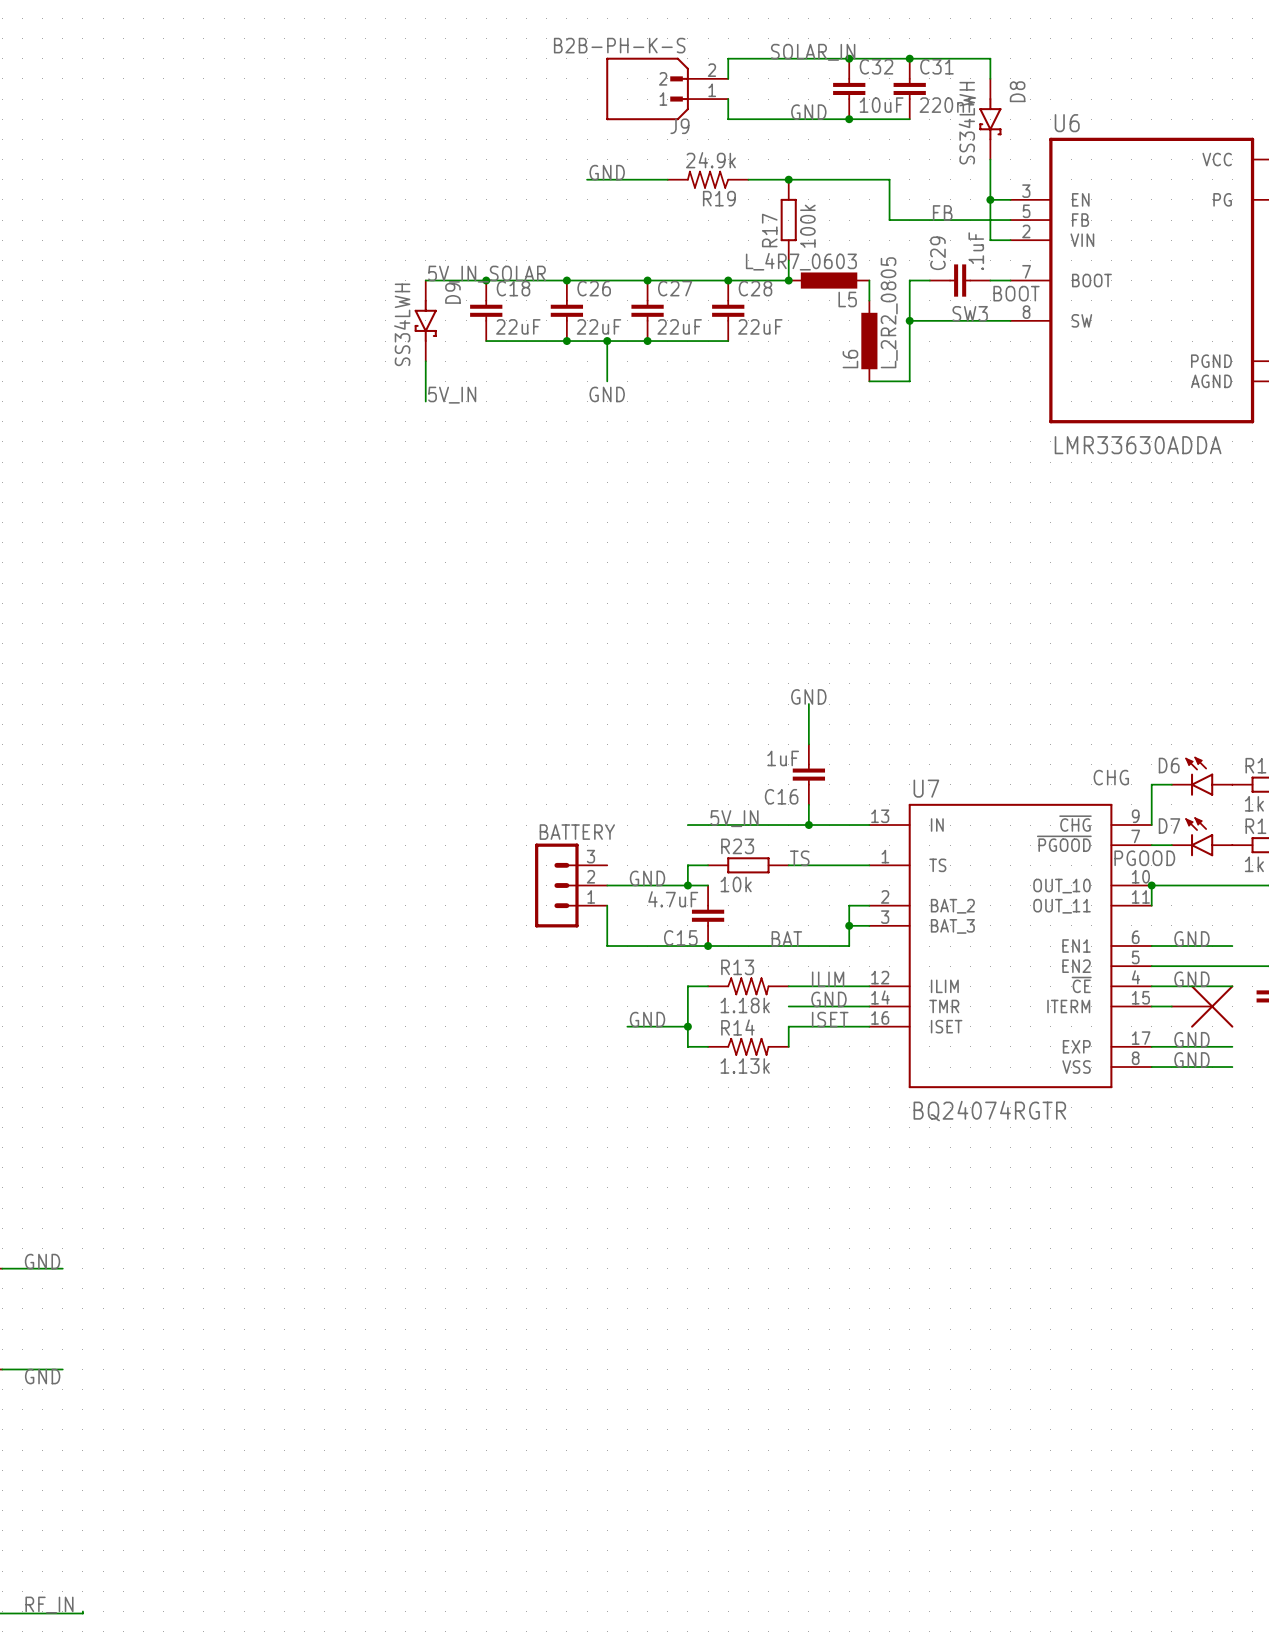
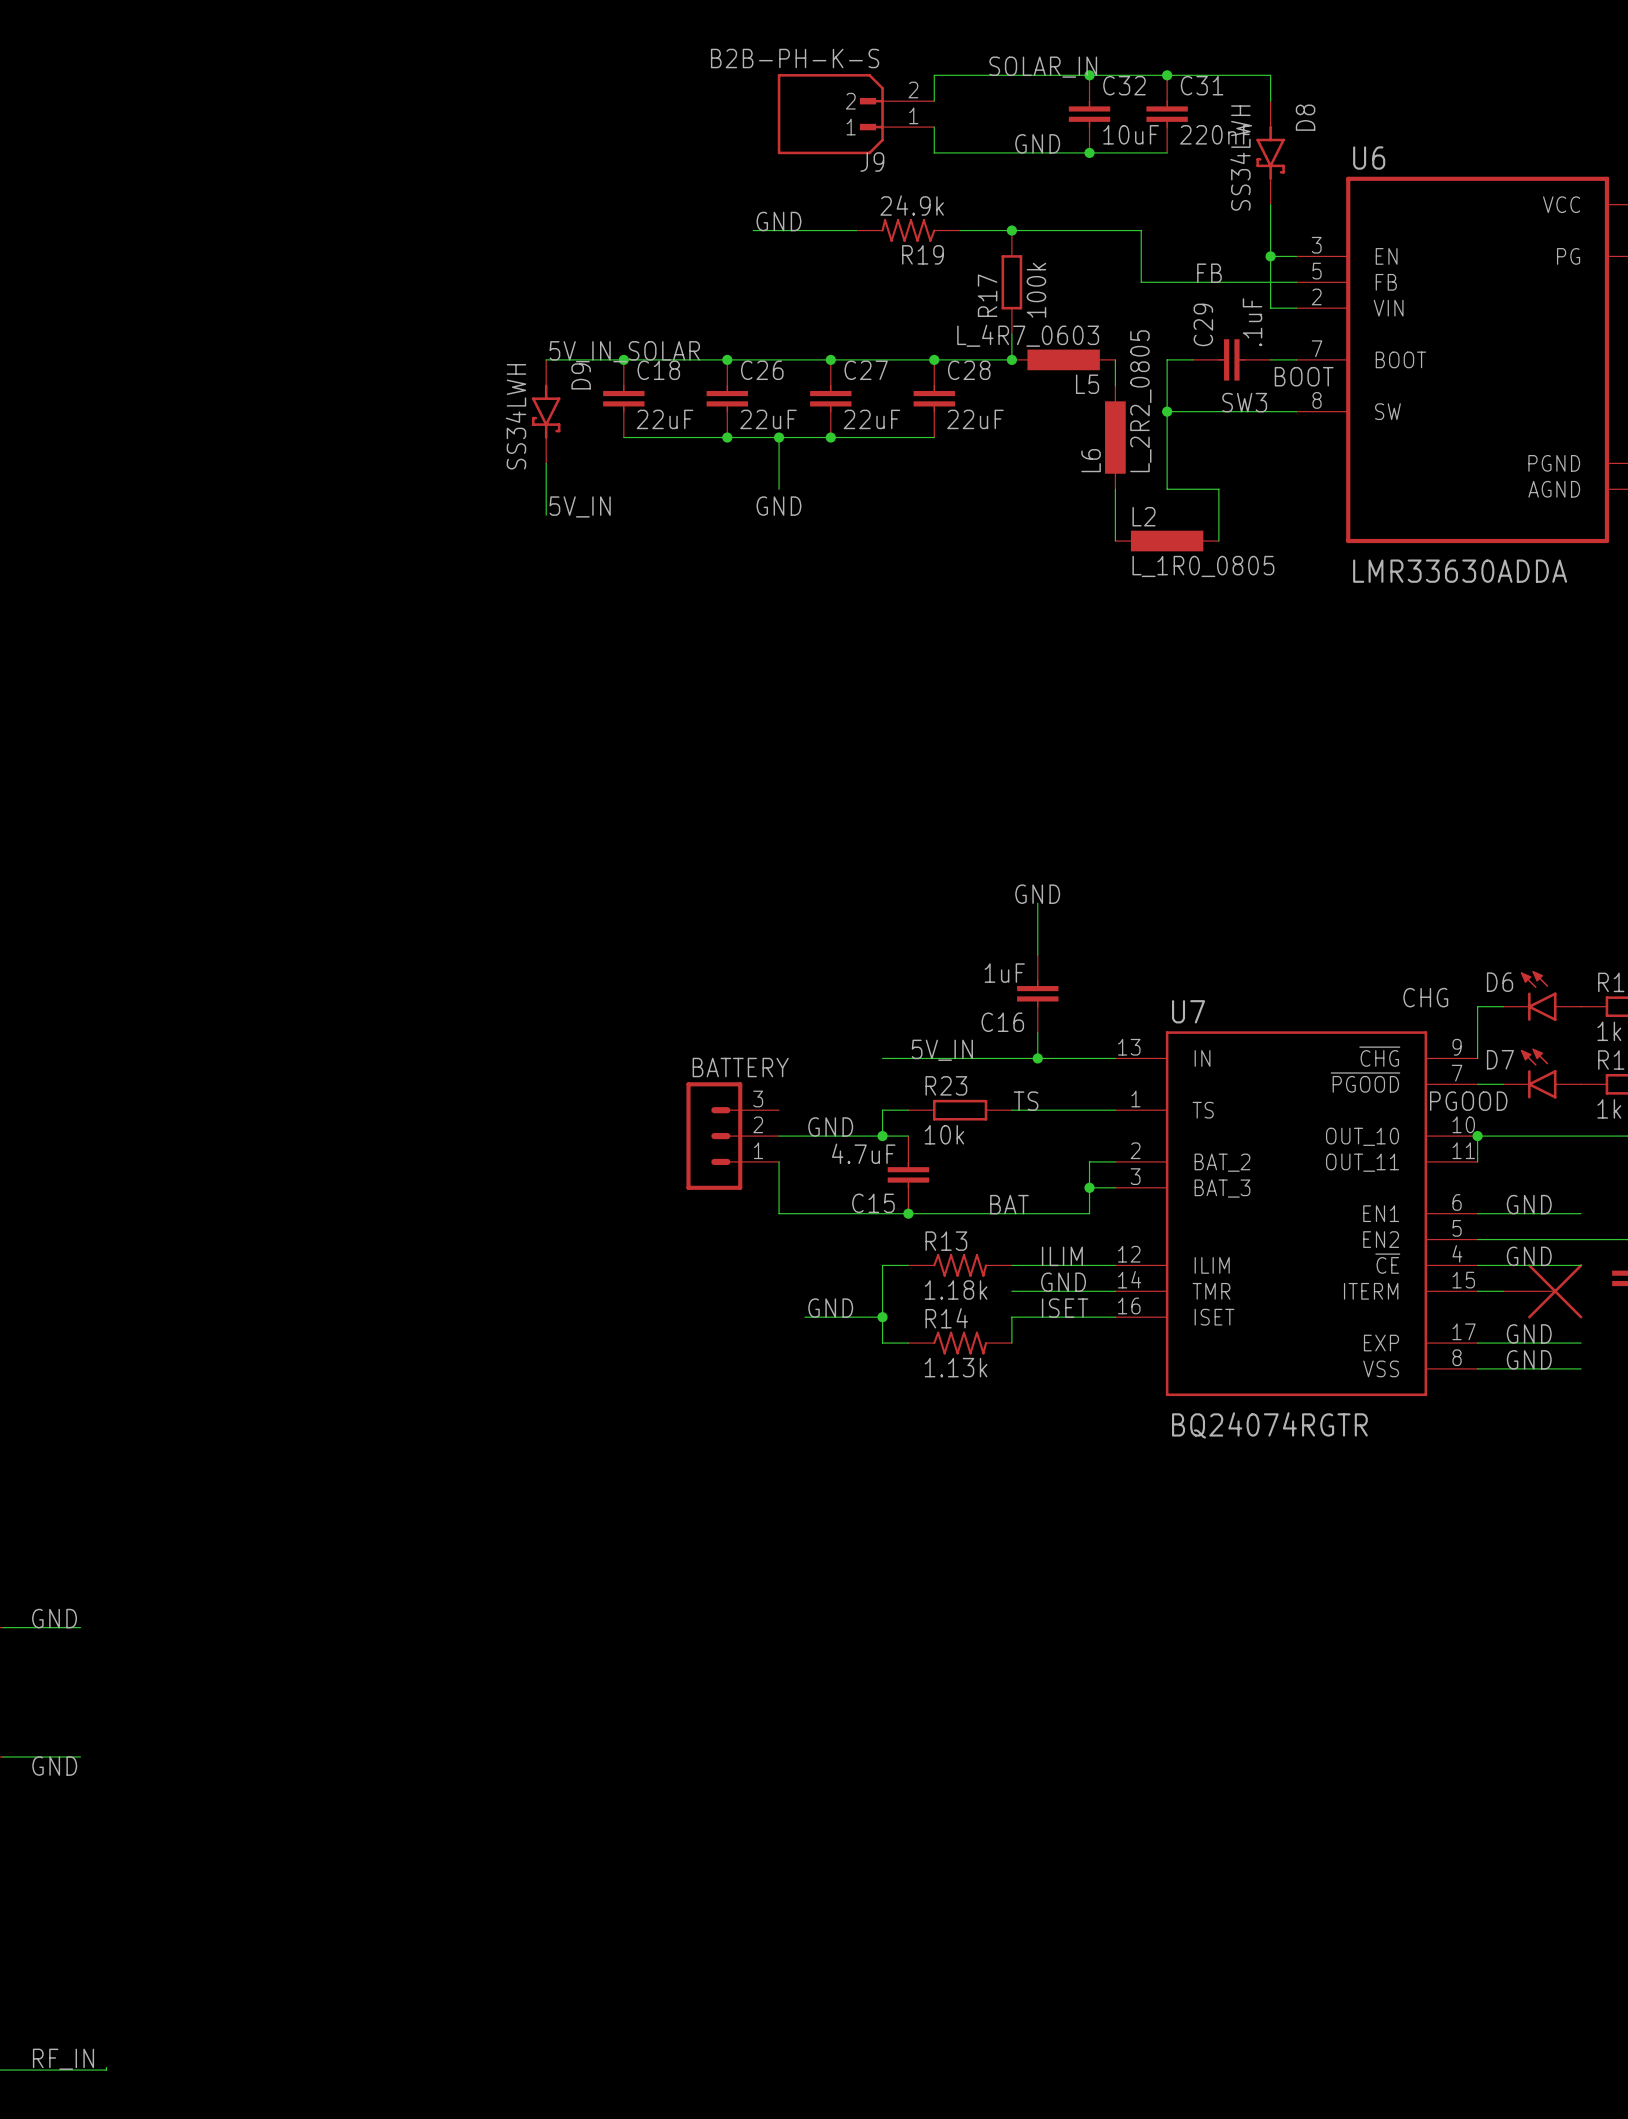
wire: (869, 381) (909, 381) -> (1115, 489) (1115, 541)
wire: none -> (1167, 489) (1218, 489) (1218, 541)
L2: none -> L_1R0_0805 (1167, 541)

